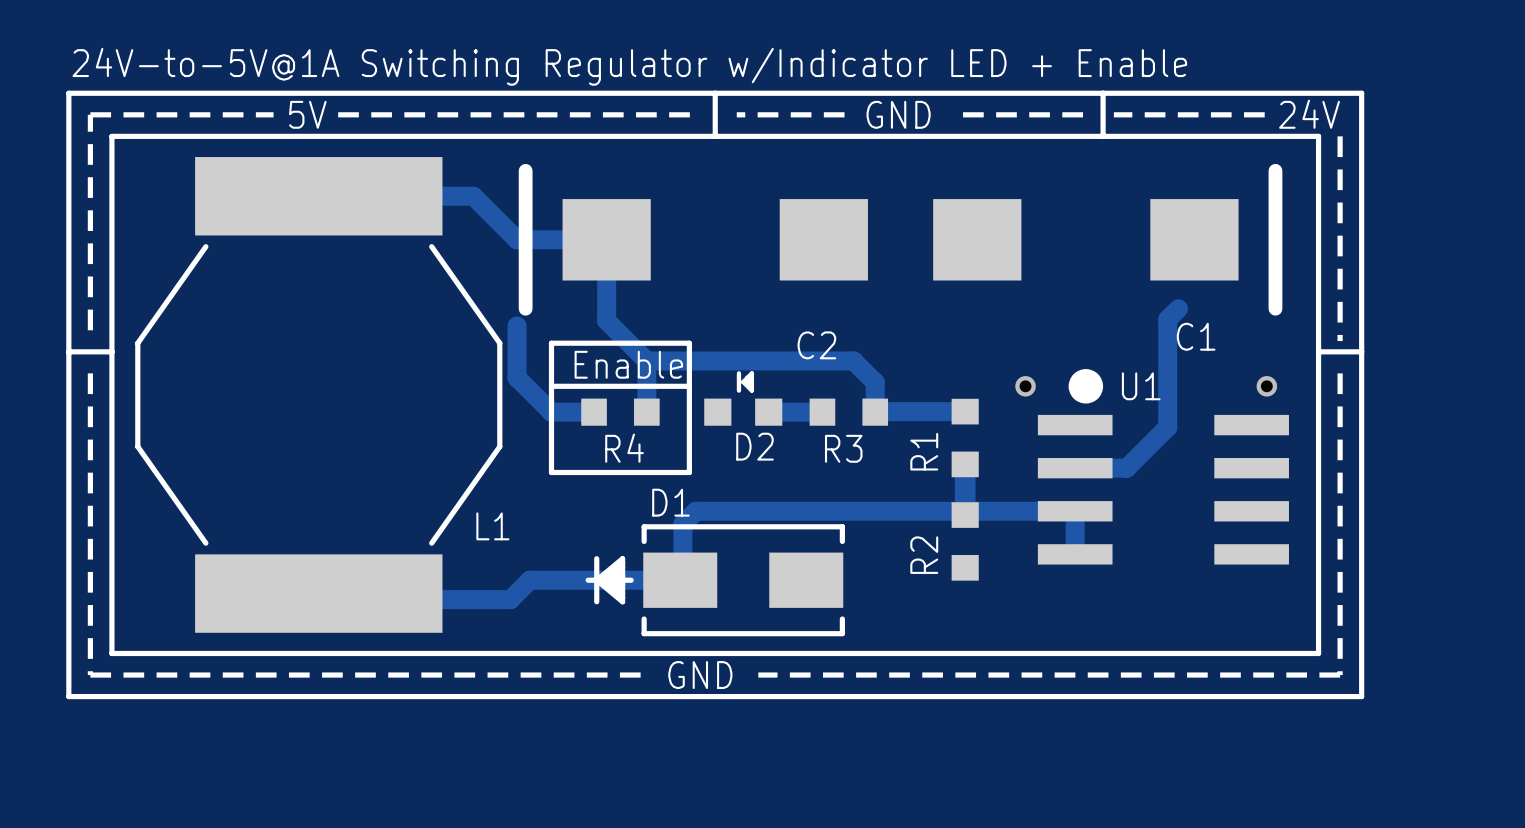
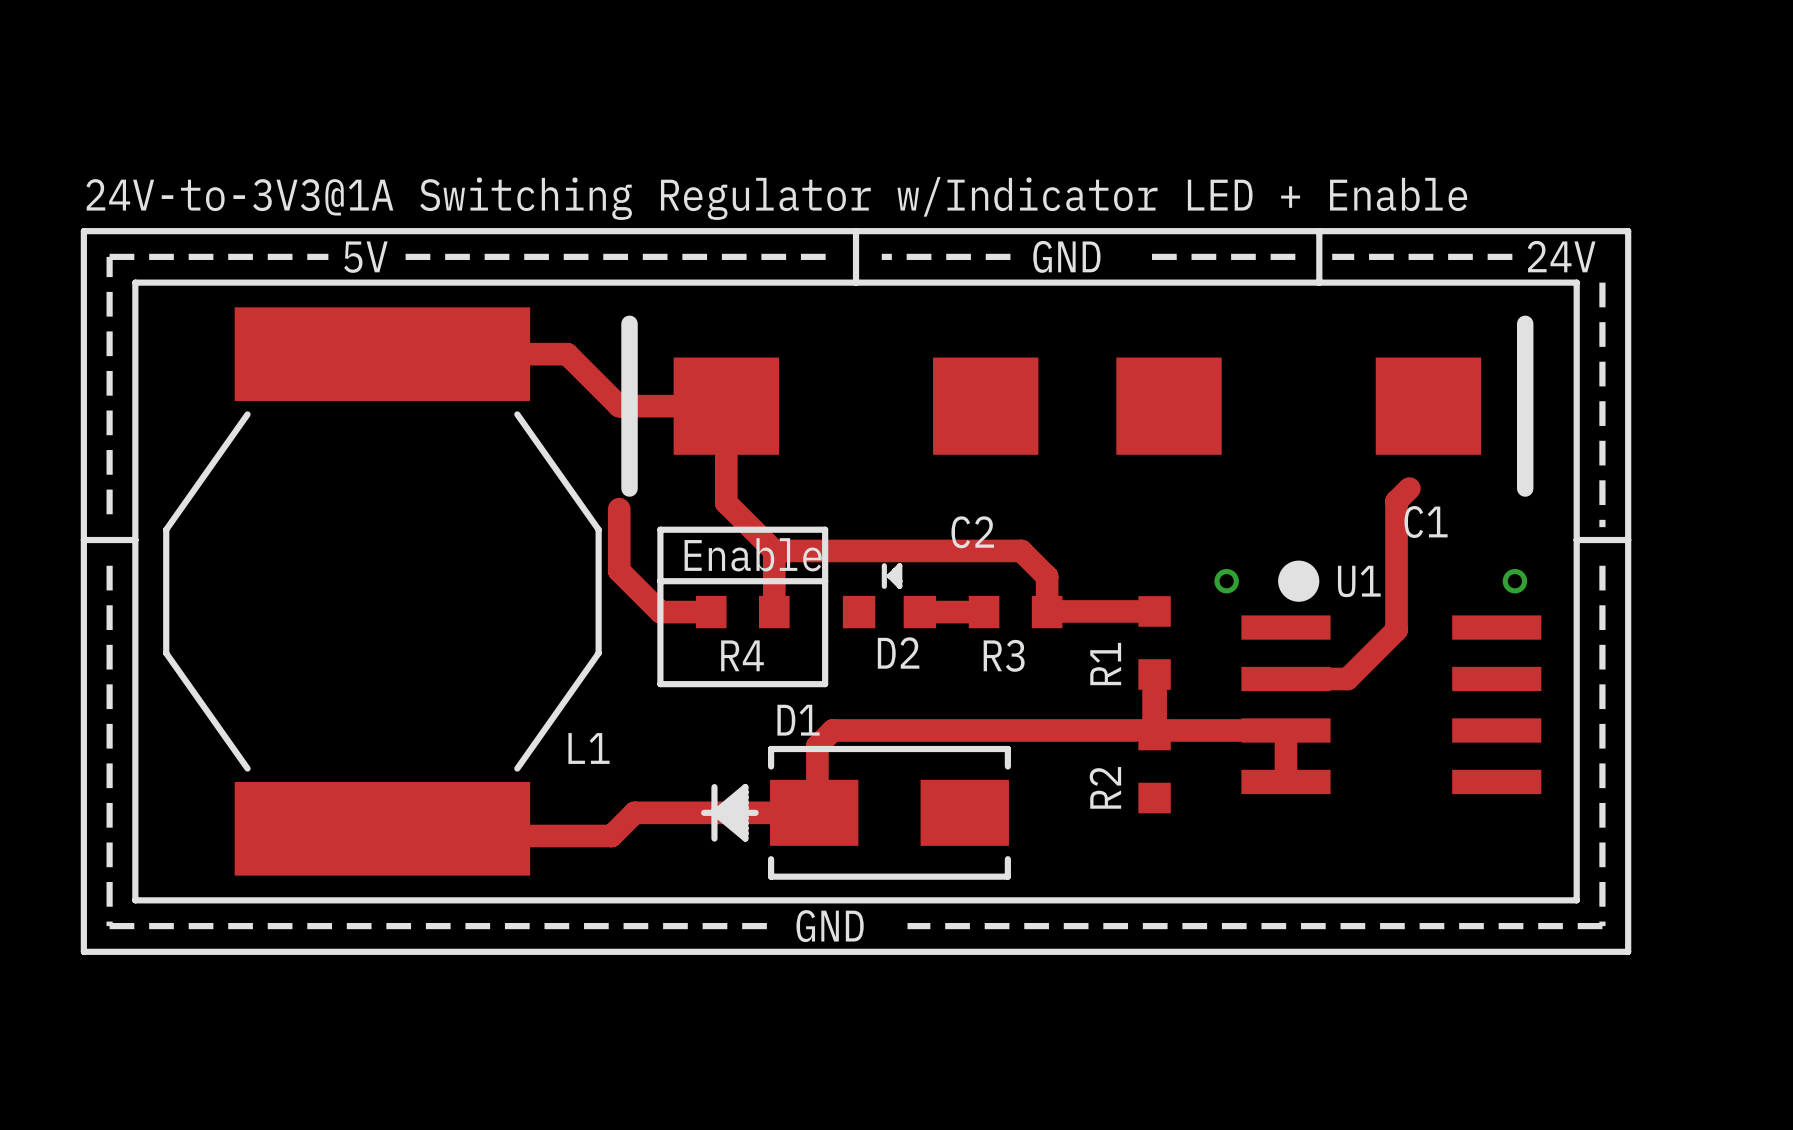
text: 24V-to-5V@1A Switching Regulator w/Indicator LED + Enable (629, 66) -> 24V-to-3V3@1A Switching Regulator w/Indicator LED + Enable (776, 198)

